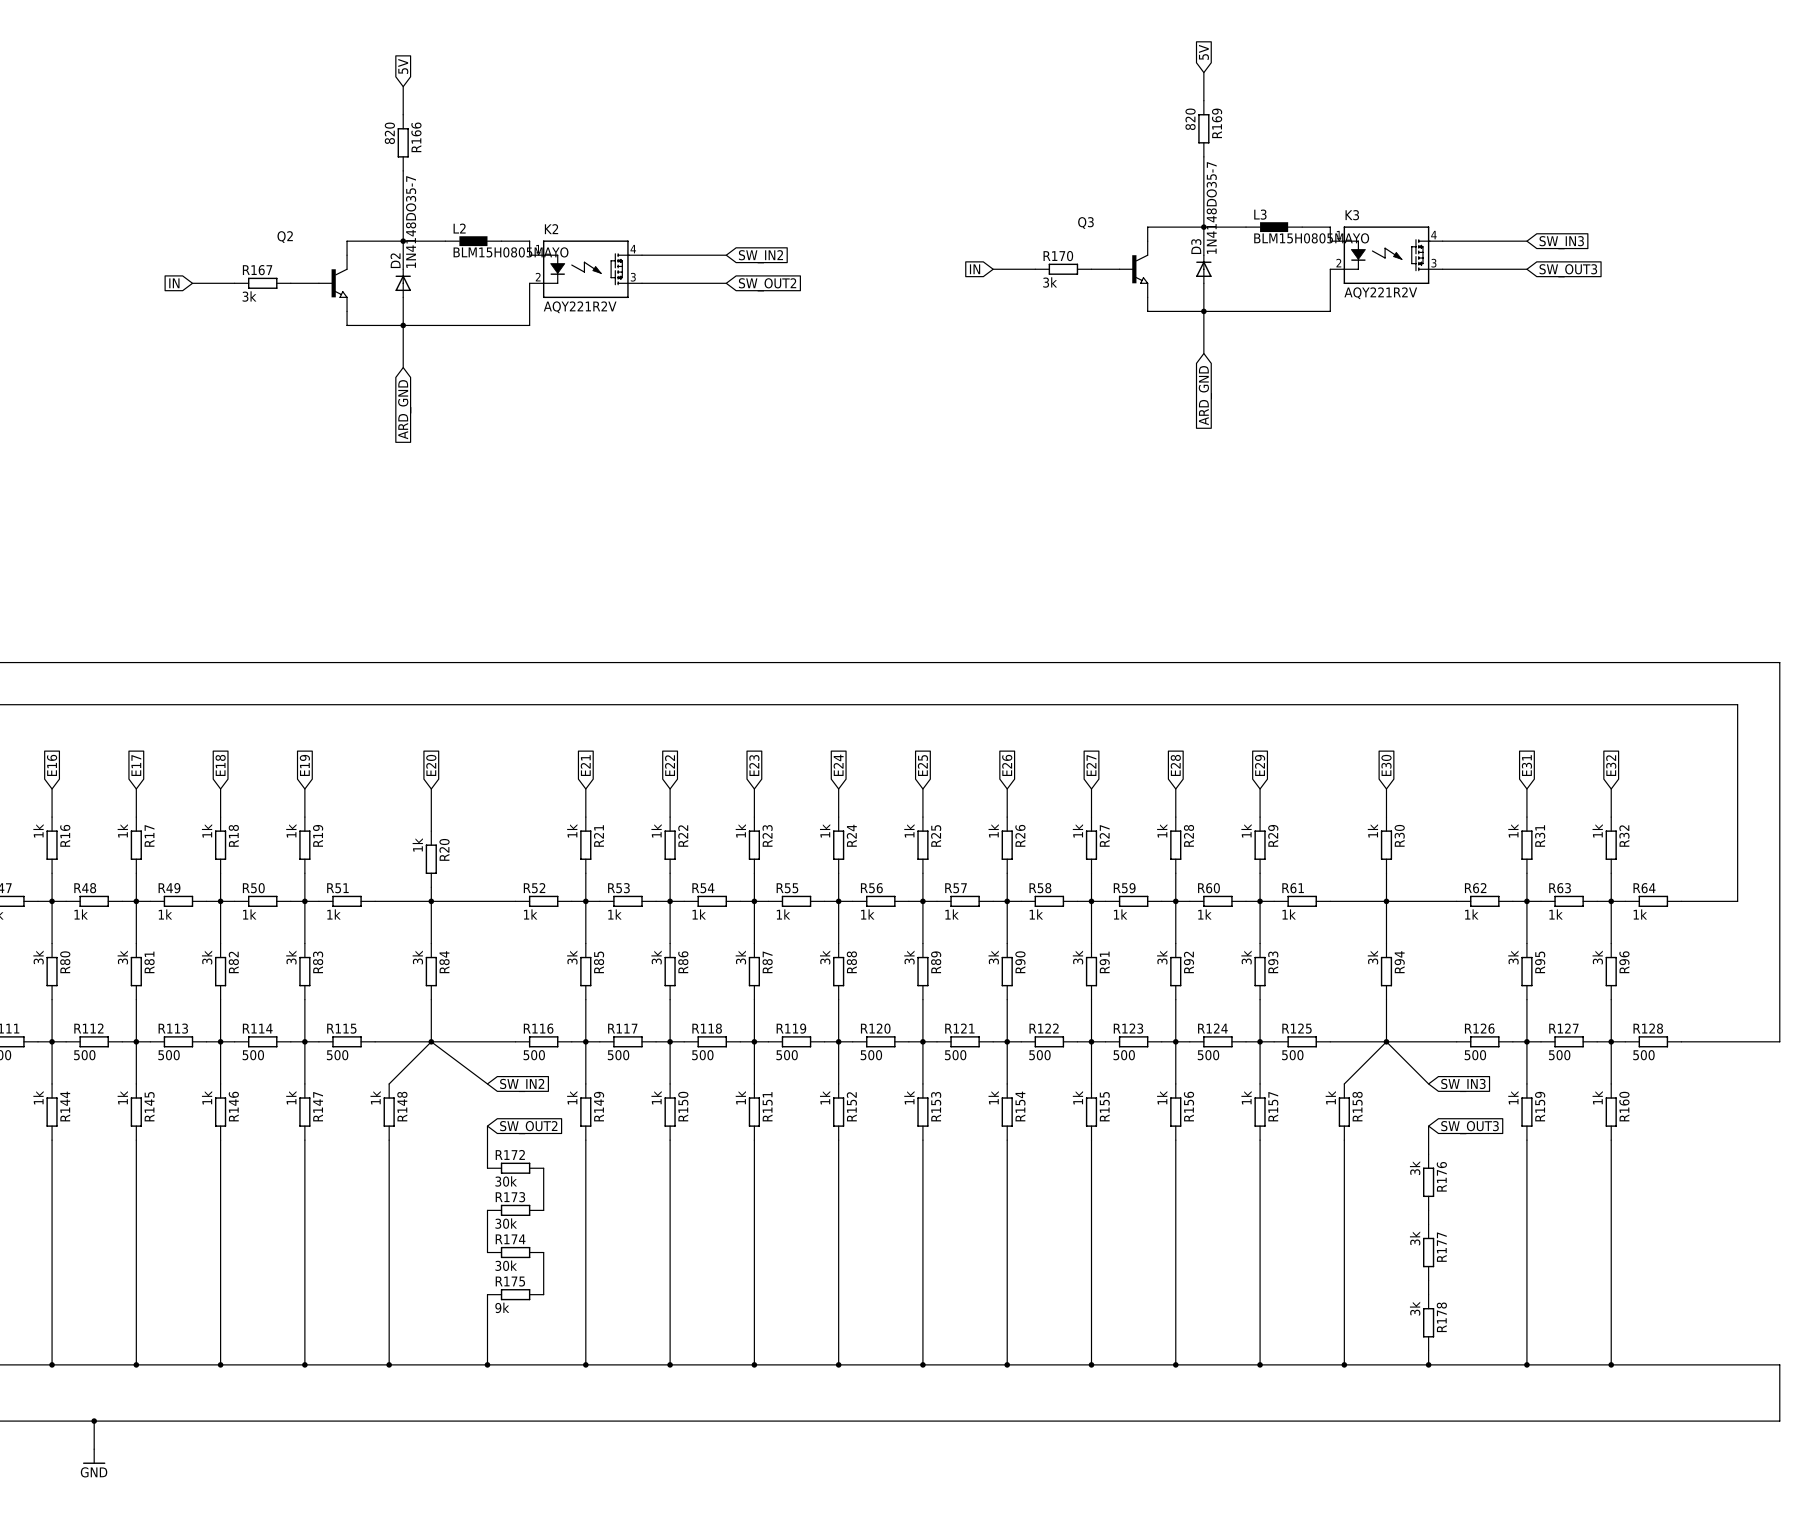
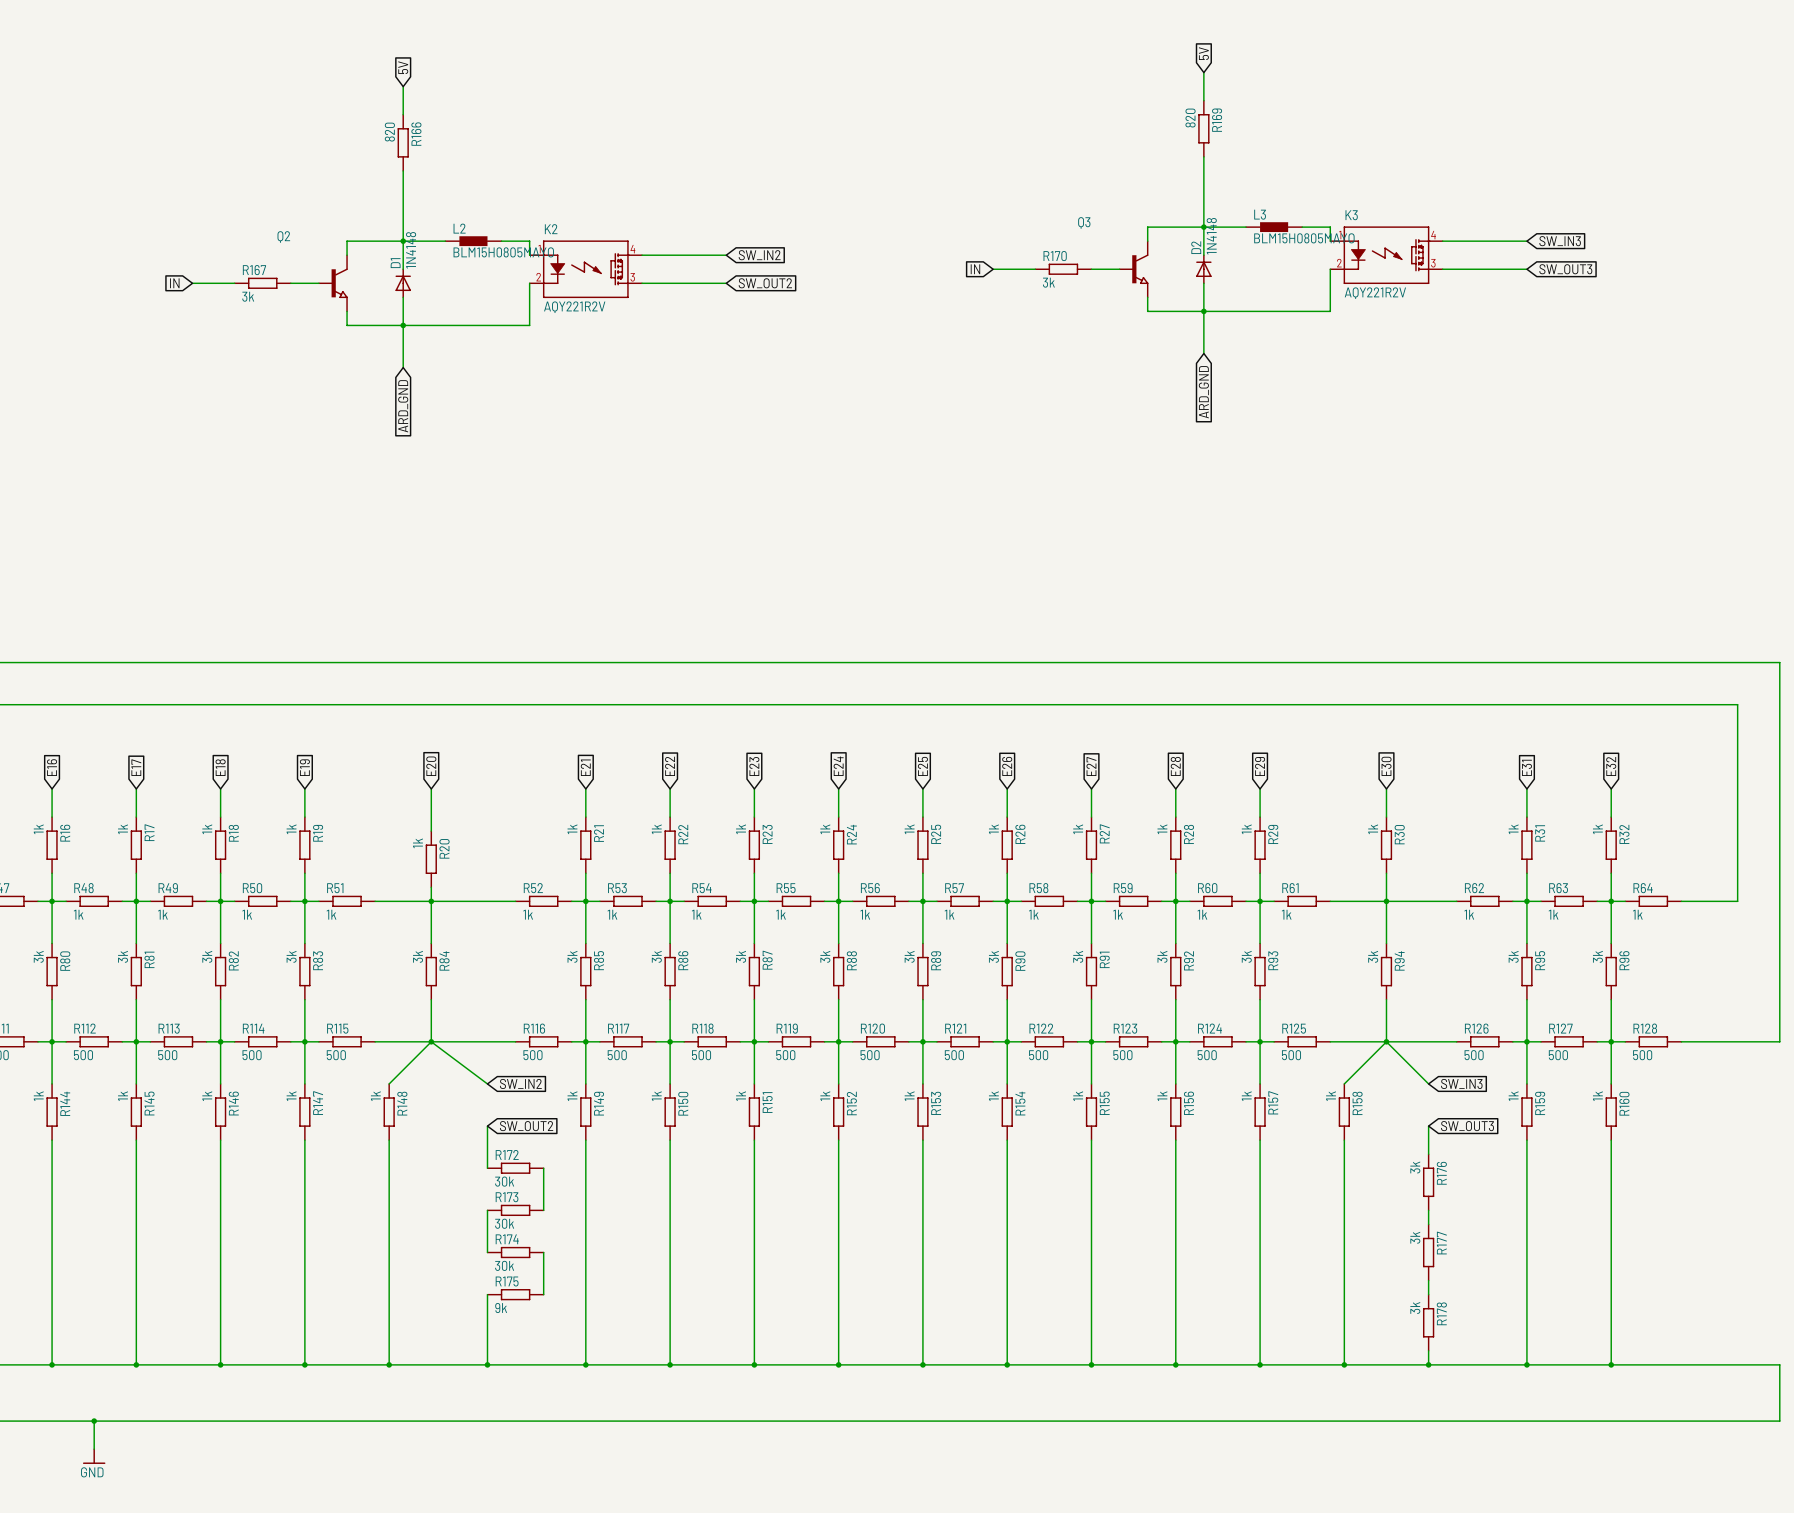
D3 value: 1N4148DO35-7 (1211, 207) -> 1N4148 (1211, 236)
D2 value: 1N4148DO35-7 (411, 222) -> 1N4148 (411, 250)
D3 name: D3 (1196, 246) -> D2 (1196, 247)
D2 name: D2 (395, 260) -> D1 (395, 263)

